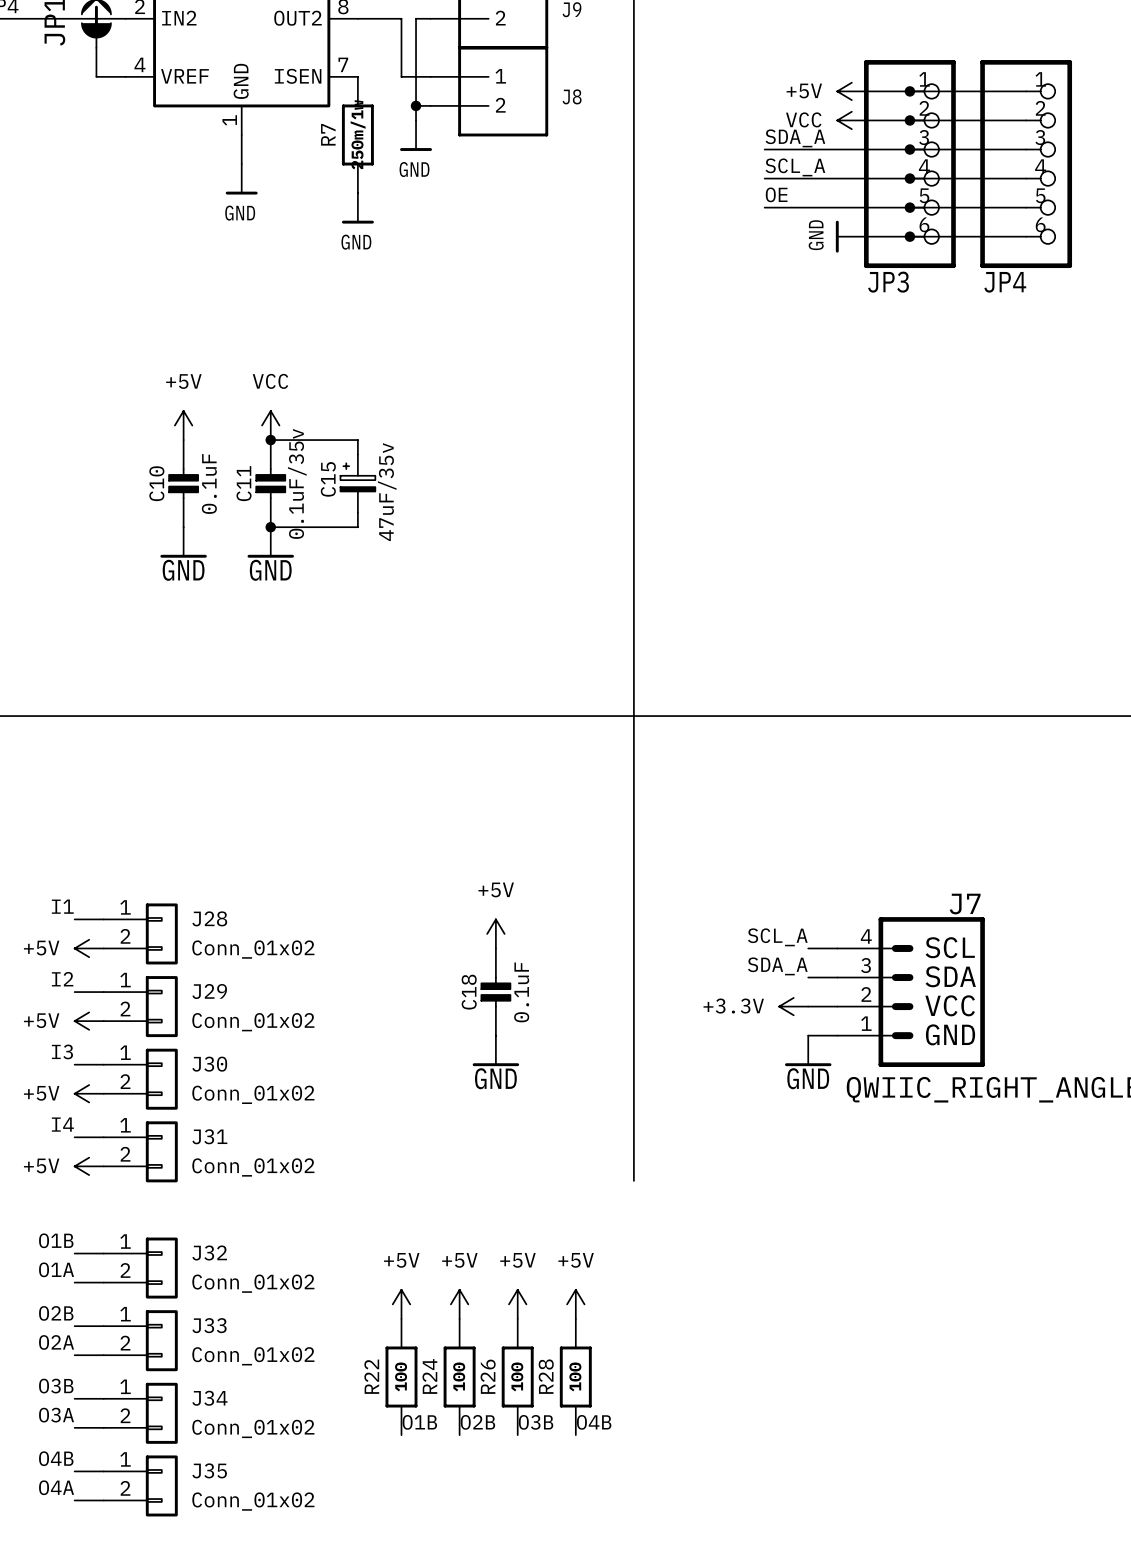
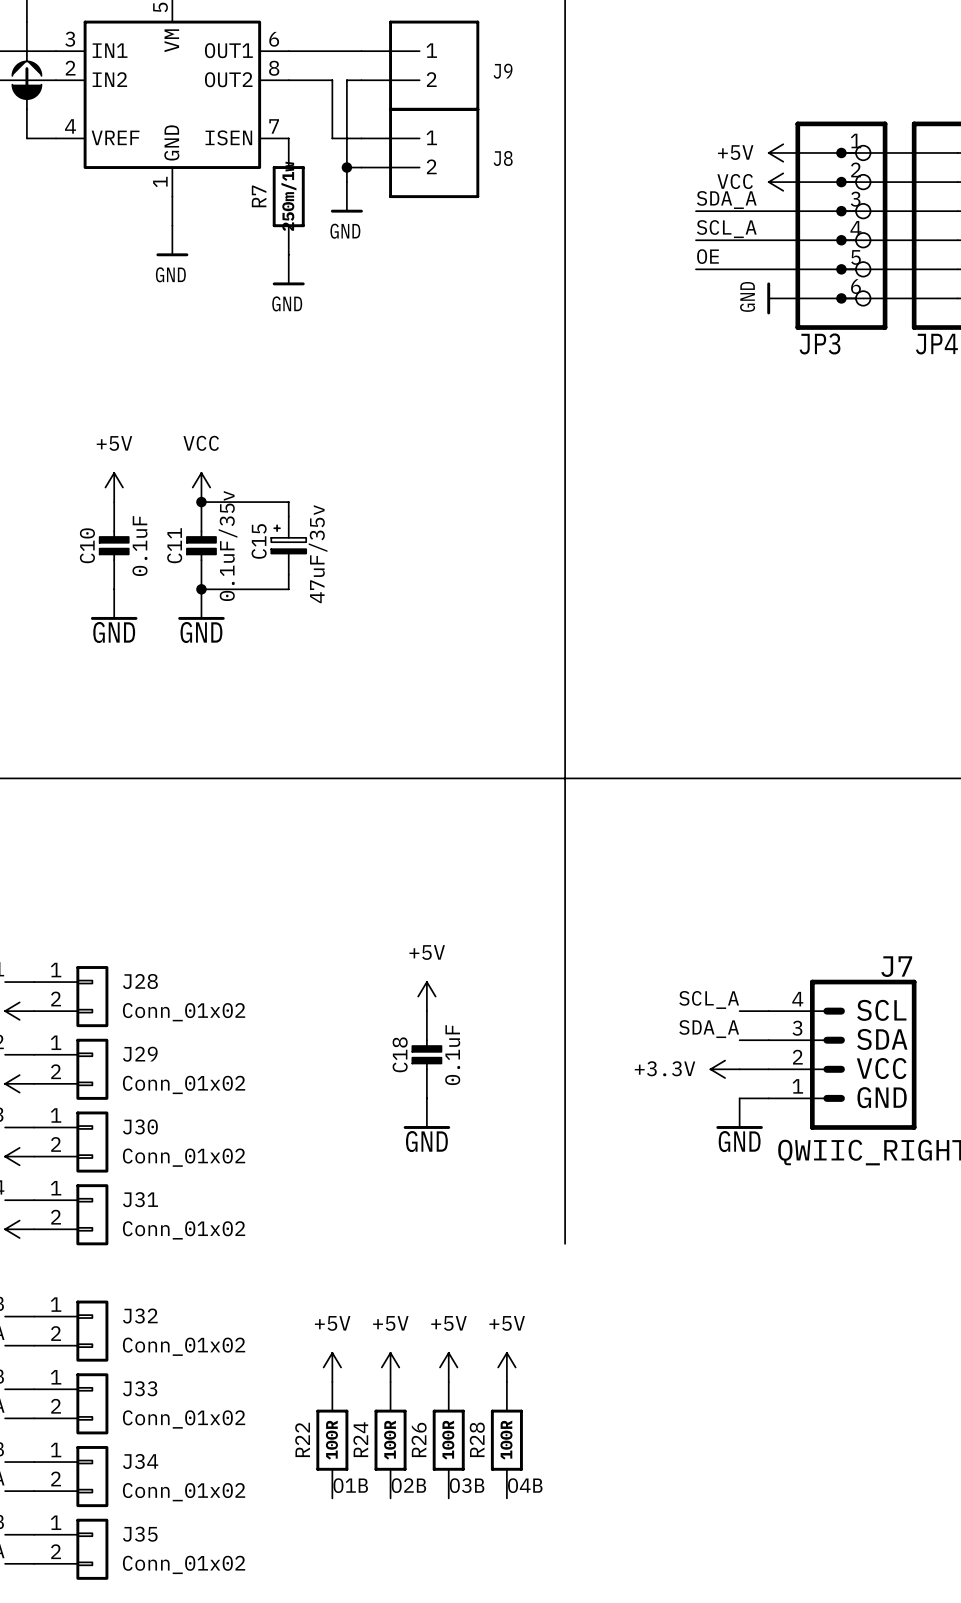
R22 value: 100 (401, 1376) -> 100R (331, 1440)
R24 value: 100 (459, 1376) -> 100R (390, 1440)
R26 value: 100 (517, 1376) -> 100R (448, 1440)
R28 value: 100 (575, 1376) -> 100R (506, 1440)

